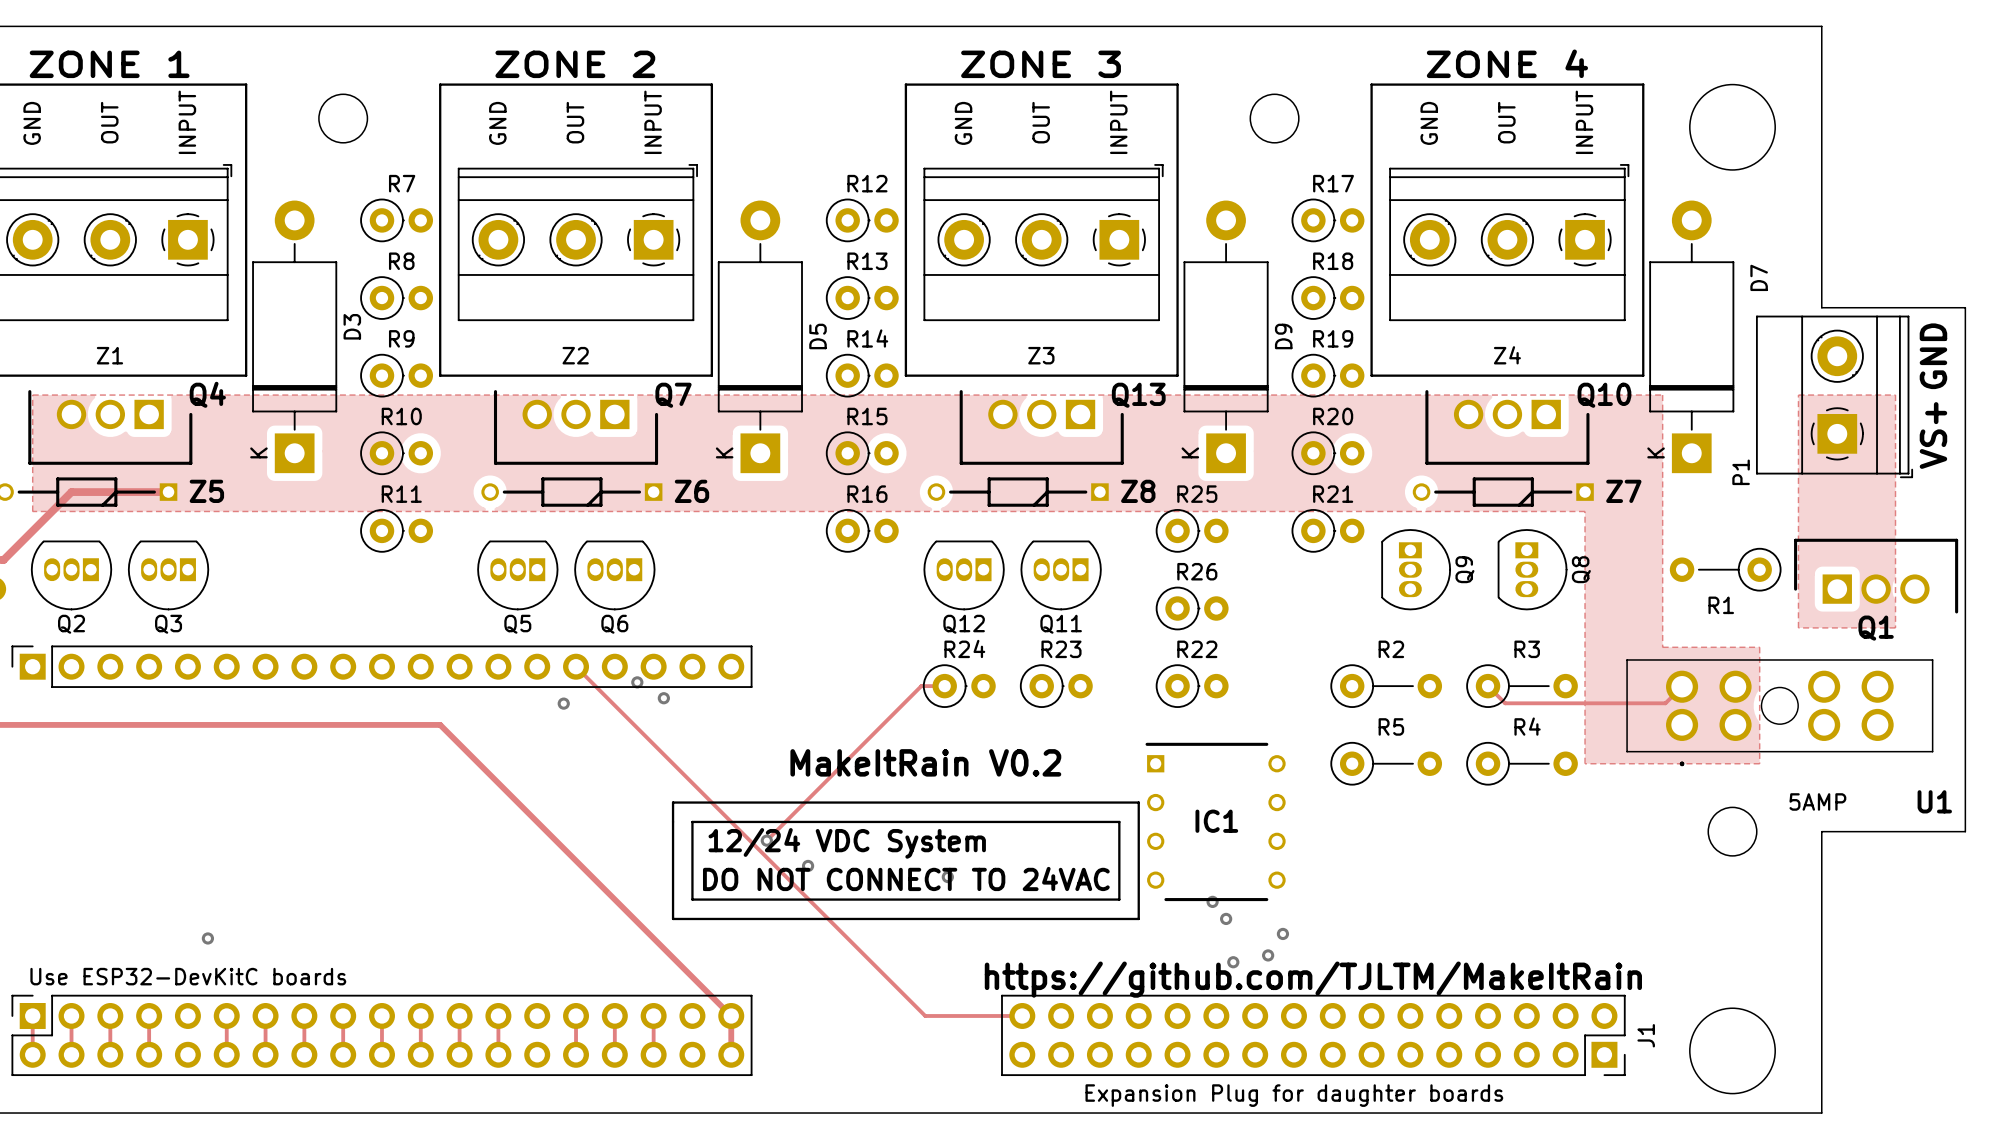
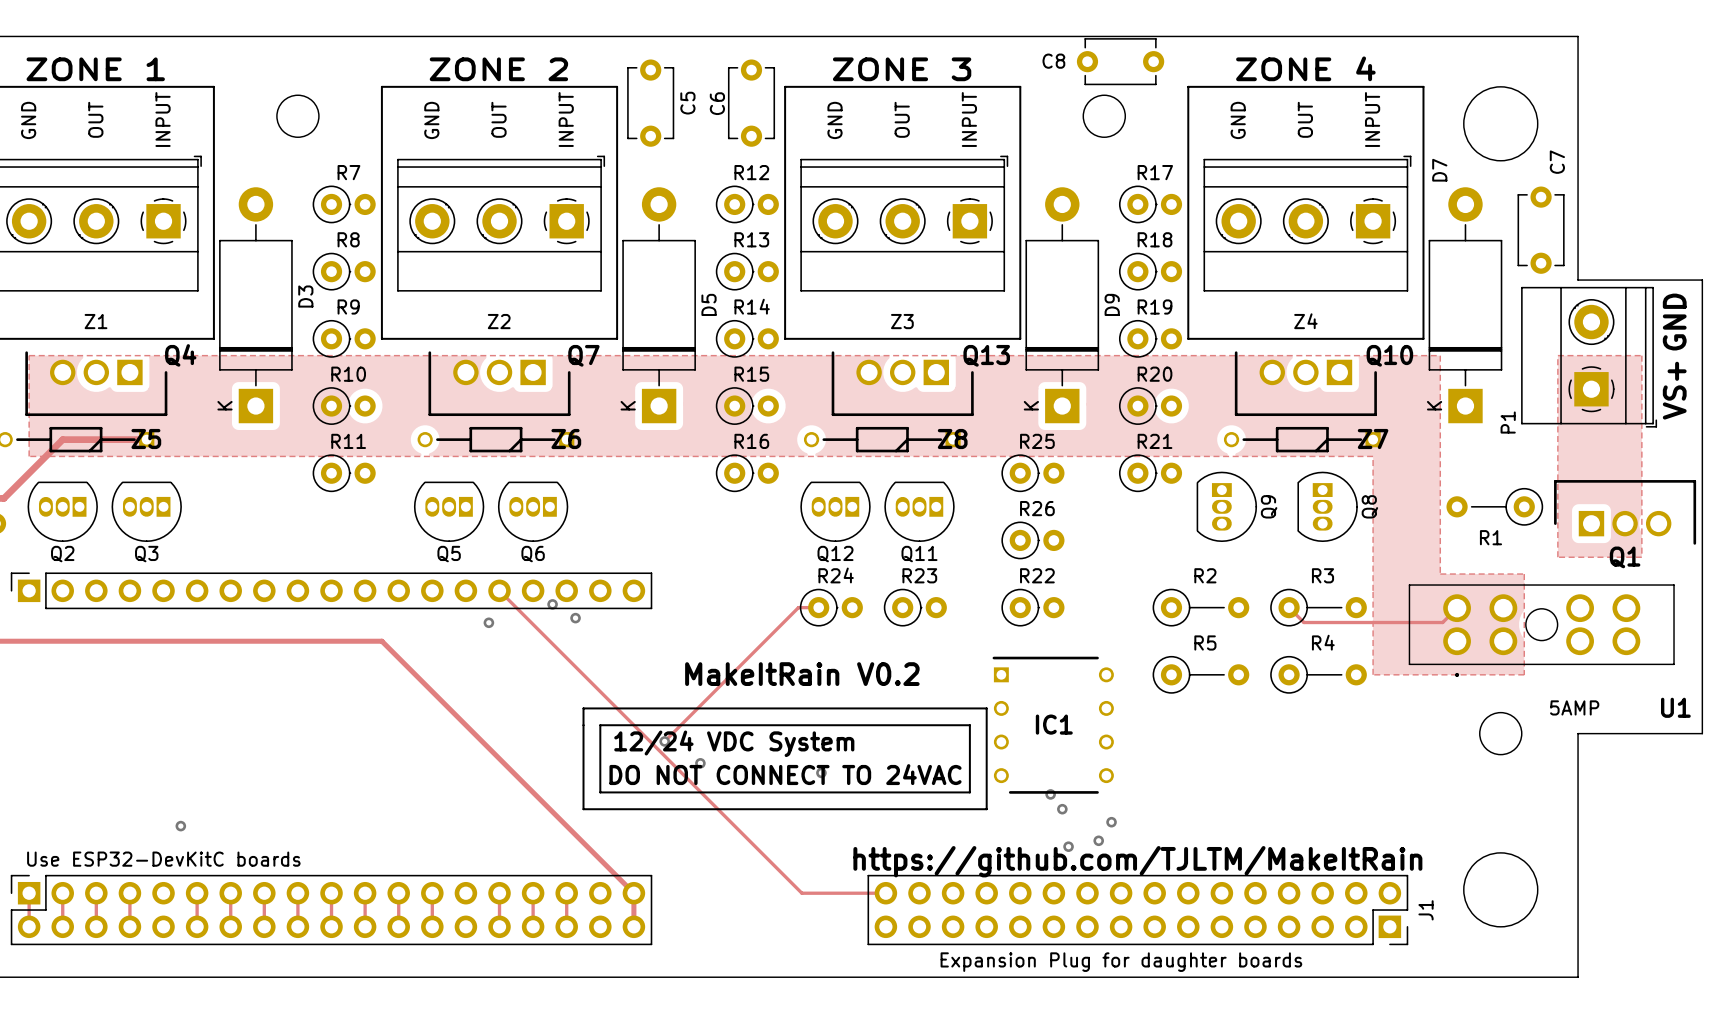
C8: none -> (1120, 61)
C5: none -> (650, 103)
C6: none -> (751, 103)
C7: none -> (1541, 230)
D7 name position: D7 (1759, 277) -> D7 (1439, 170)
Z5 name position: Z5 (206, 491) -> Z5 (146, 439)
Z6 name position: Z6 (691, 491) -> Z6 (566, 439)
Z8 name position: Z8 (1138, 491) -> Z8 (952, 439)
Z7 name position: Z7 (1623, 491) -> Z7 (1373, 439)
round board edge position: (1732, 1050) -> (1500, 889)

